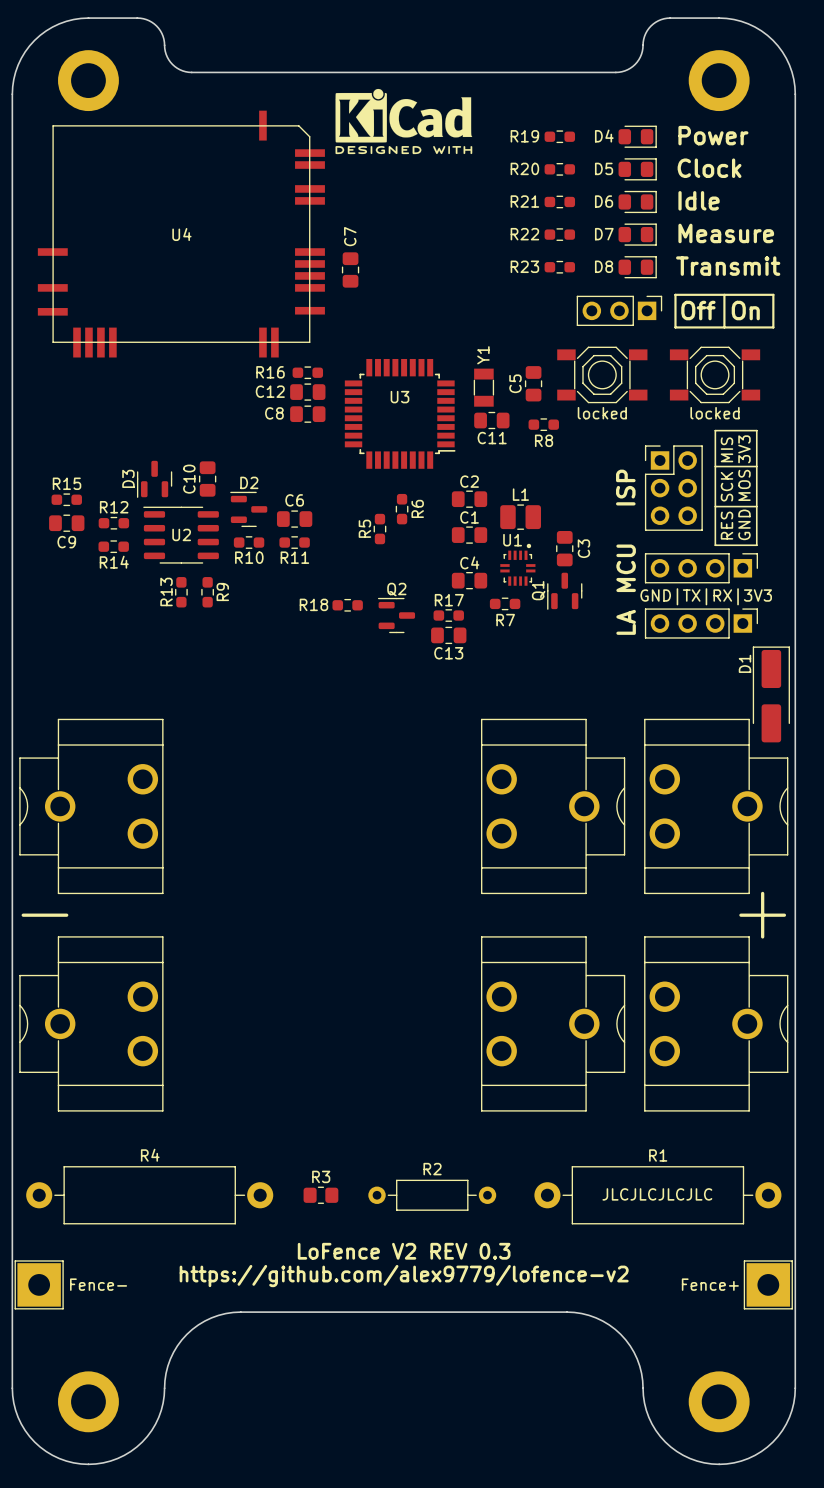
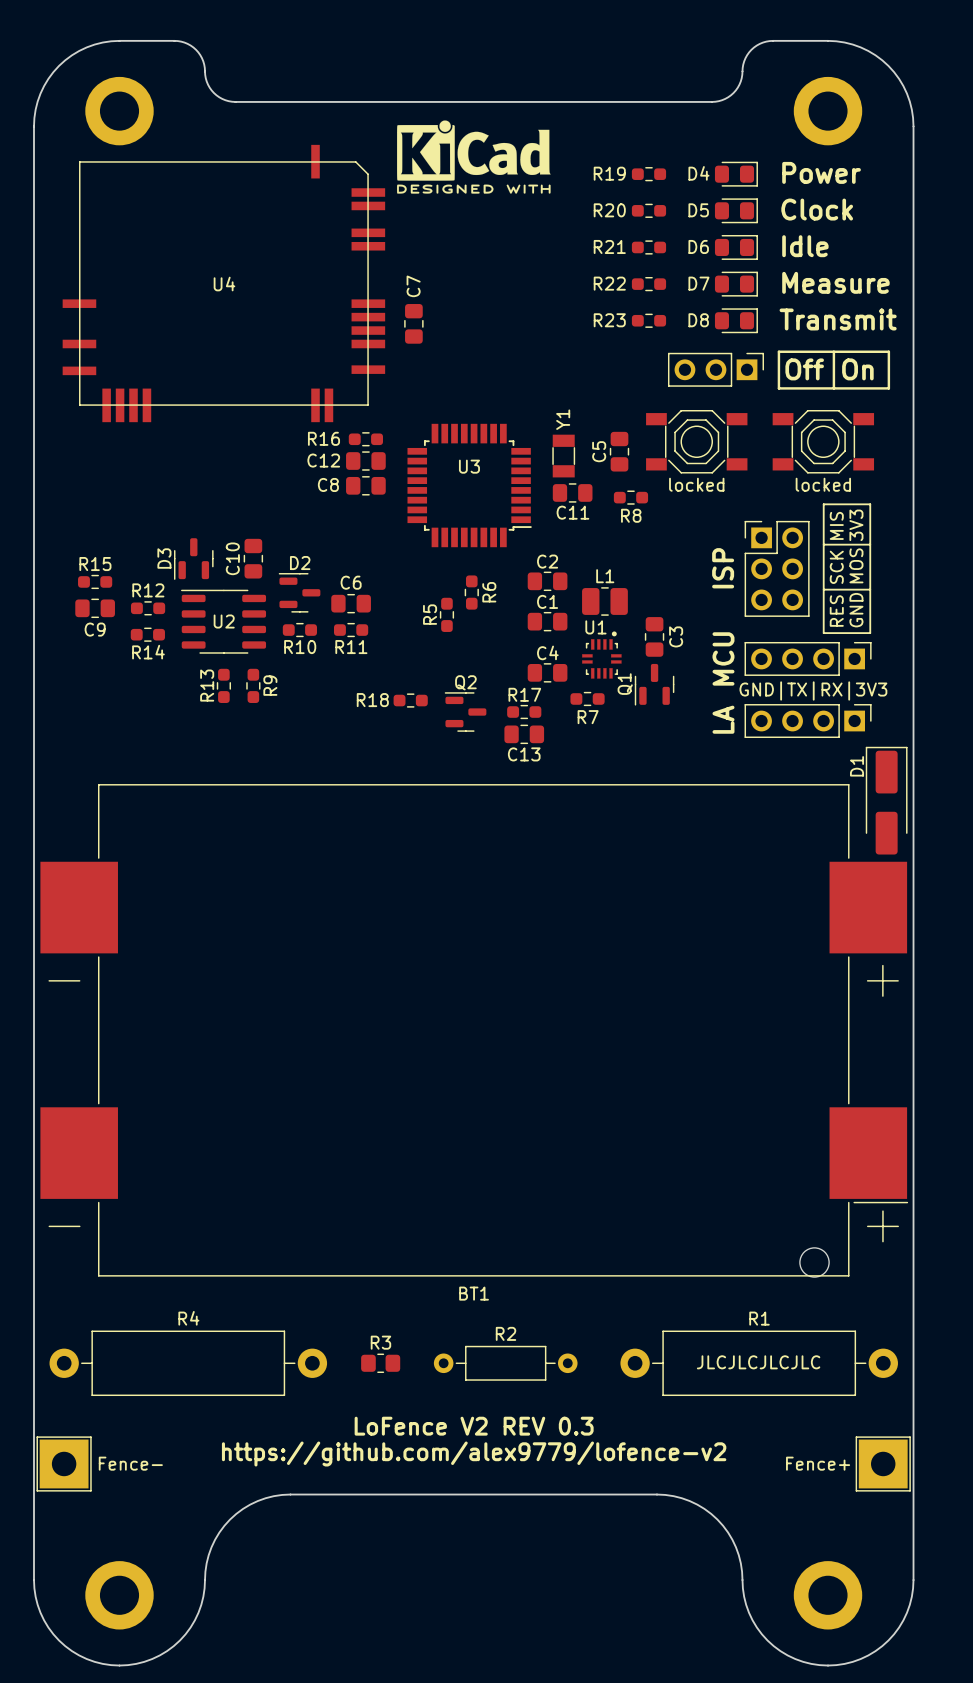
part: (91, 806) -> none
part: (553, 806) -> none
part: (716, 806) -> none
line: (762, 893) (762, 936) -> none
BT1: none -> (474, 1030)
line: (23, 915) (66, 915) -> none
line: (740, 915) (784, 915) -> none
part: (91, 1023) -> none
part: (553, 1023) -> none
part: (716, 1023) -> none

